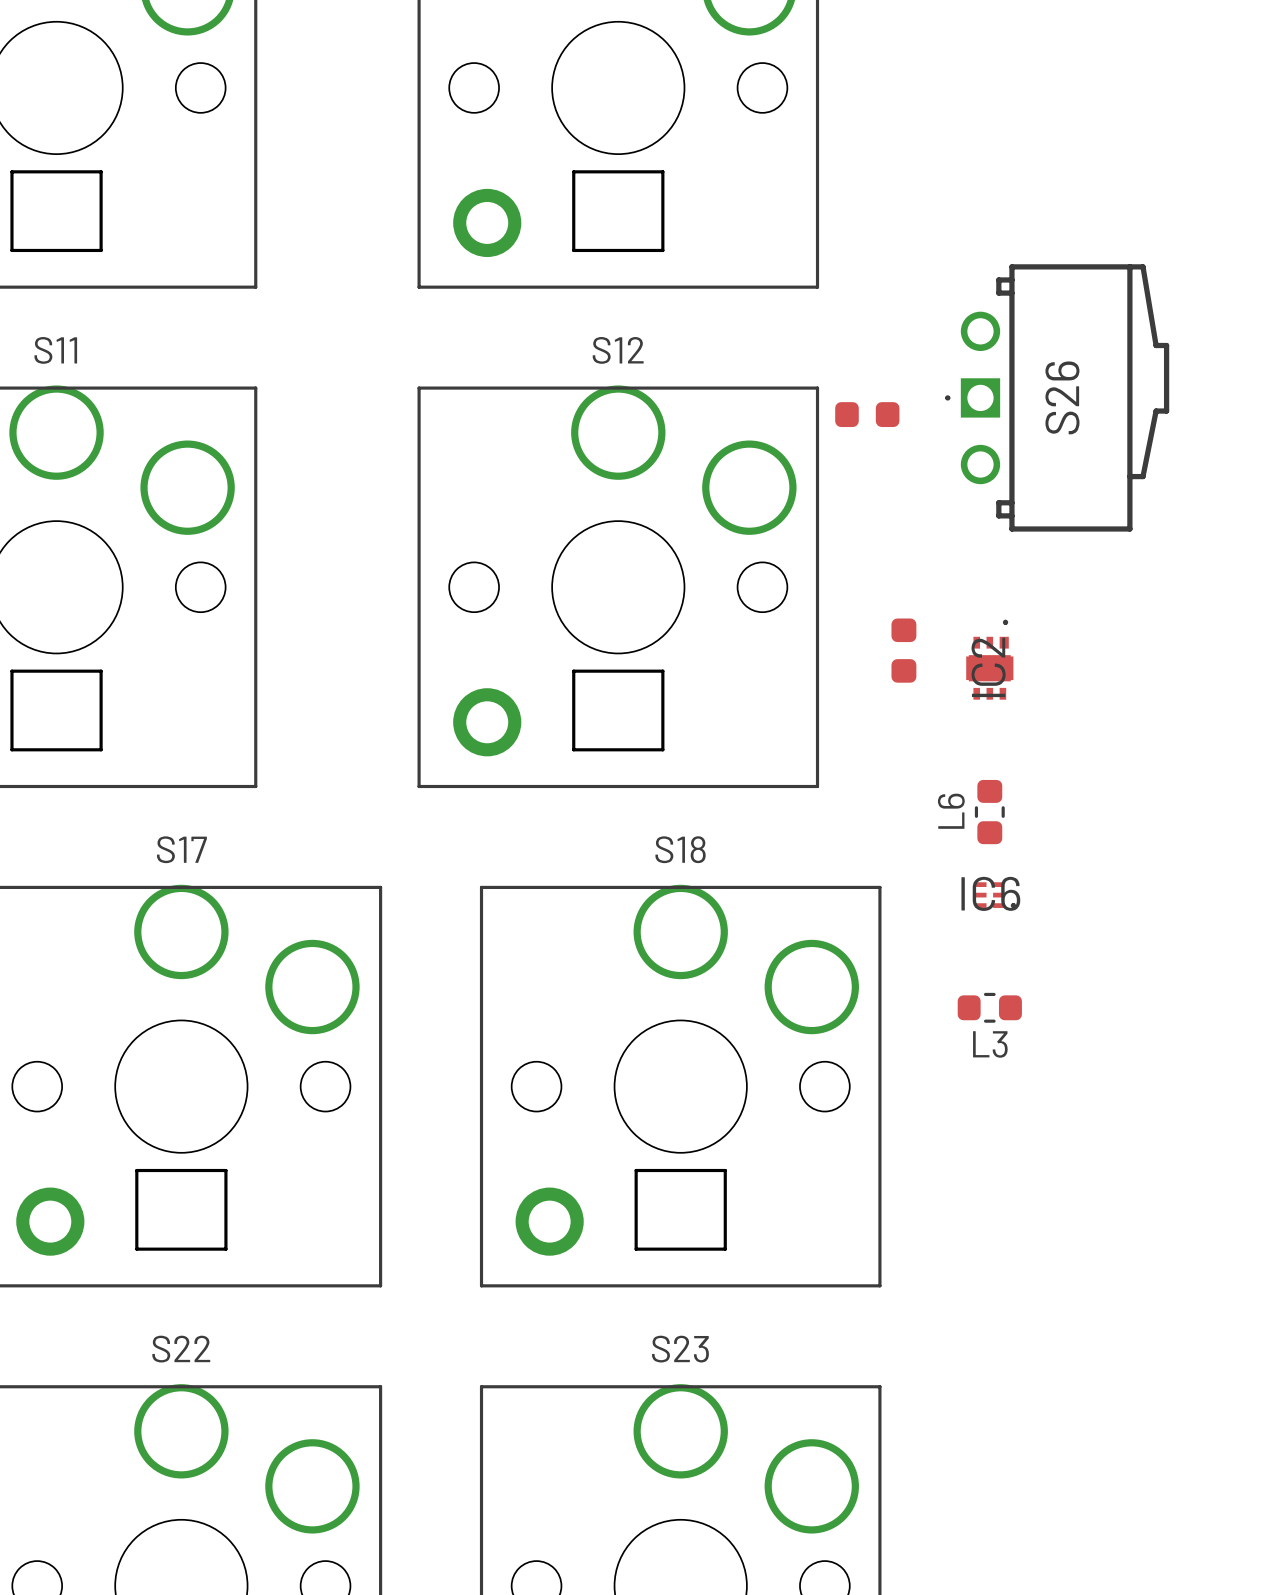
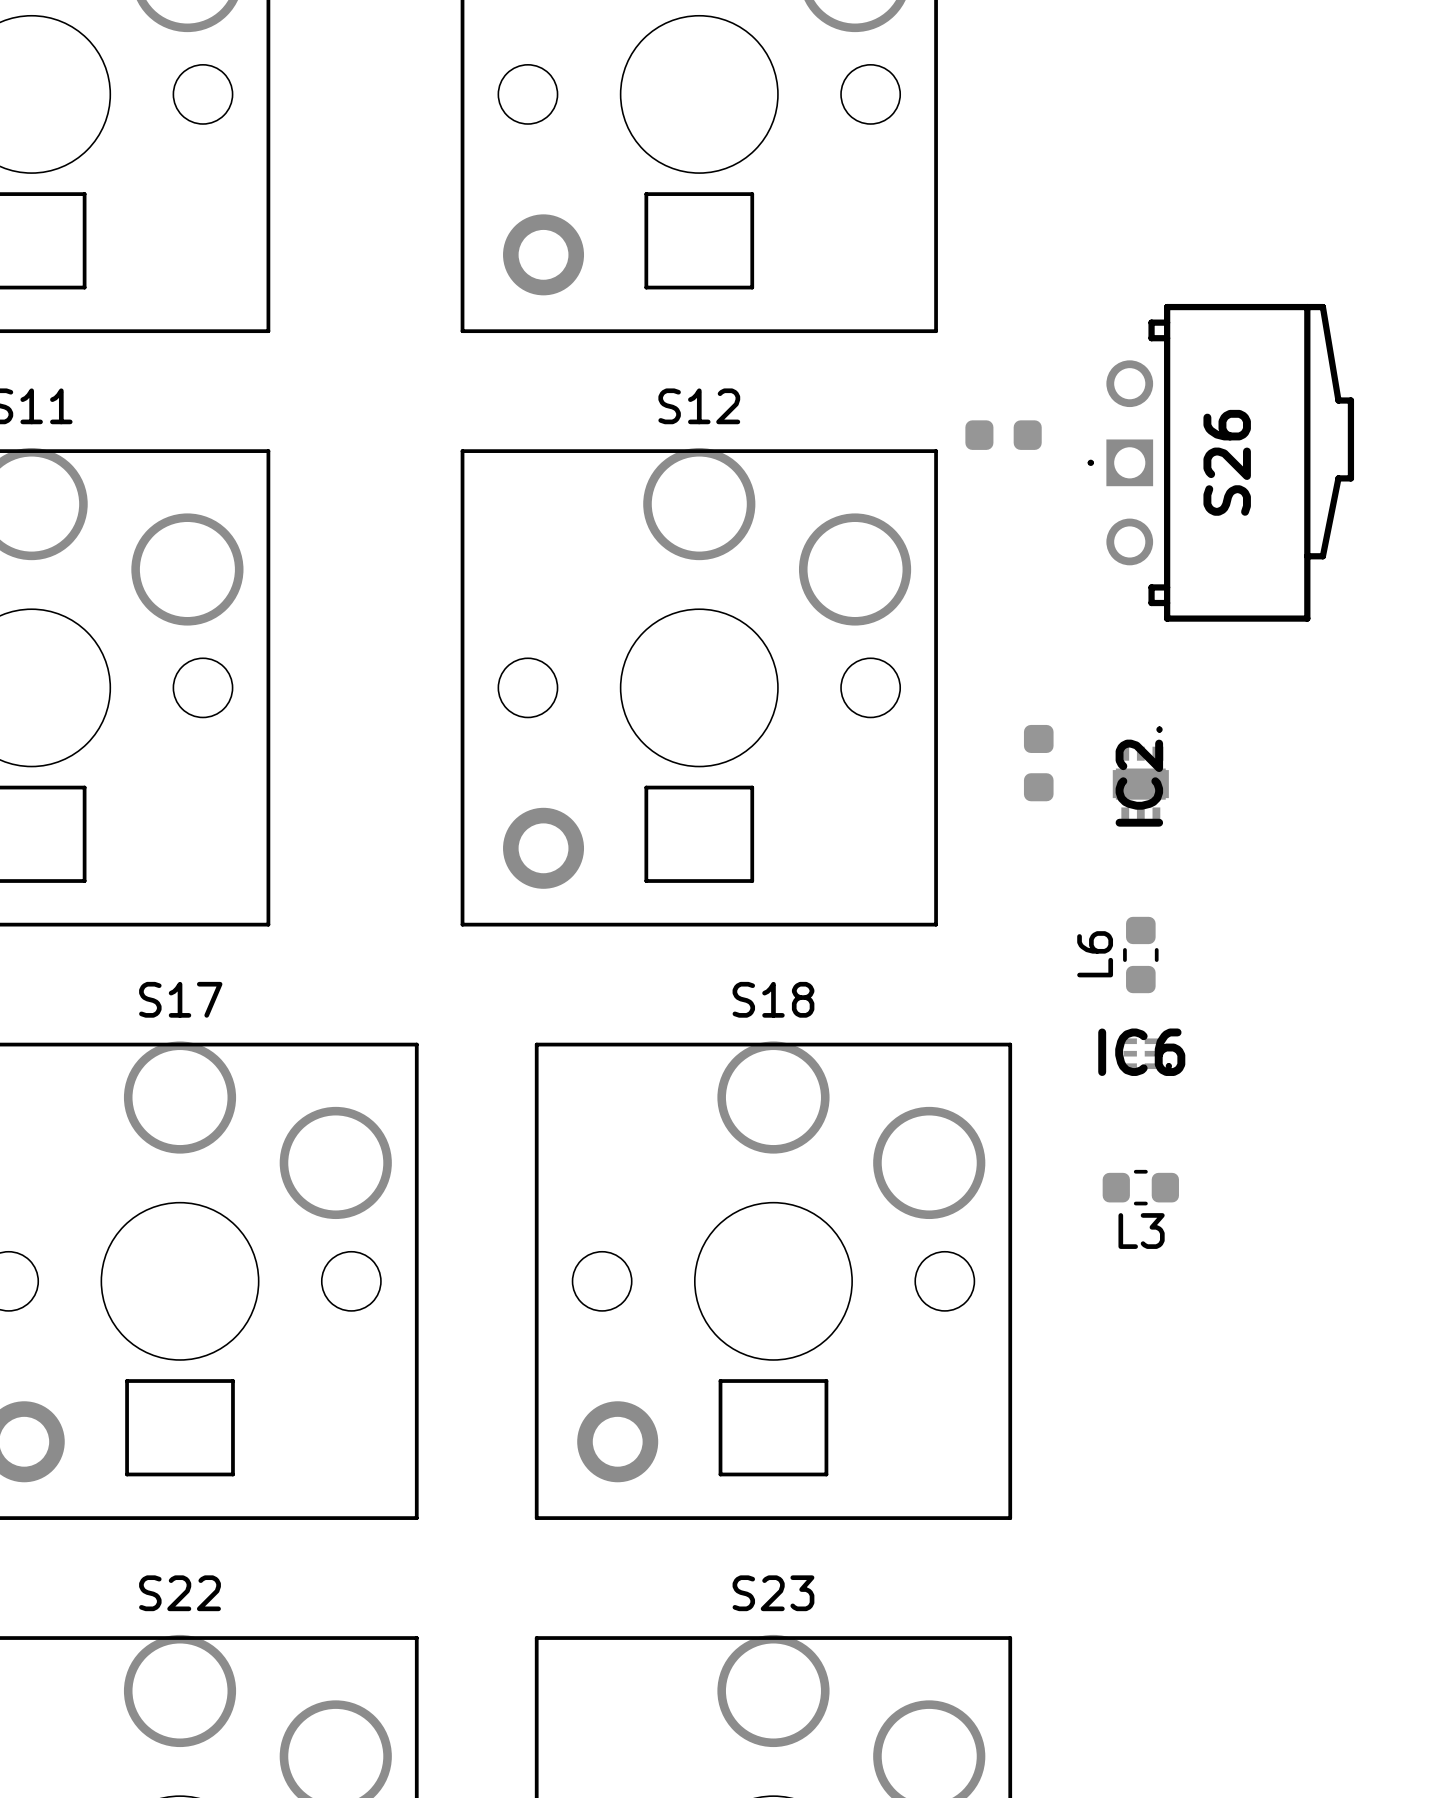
part position: (867, 414) -> (1003, 435)

